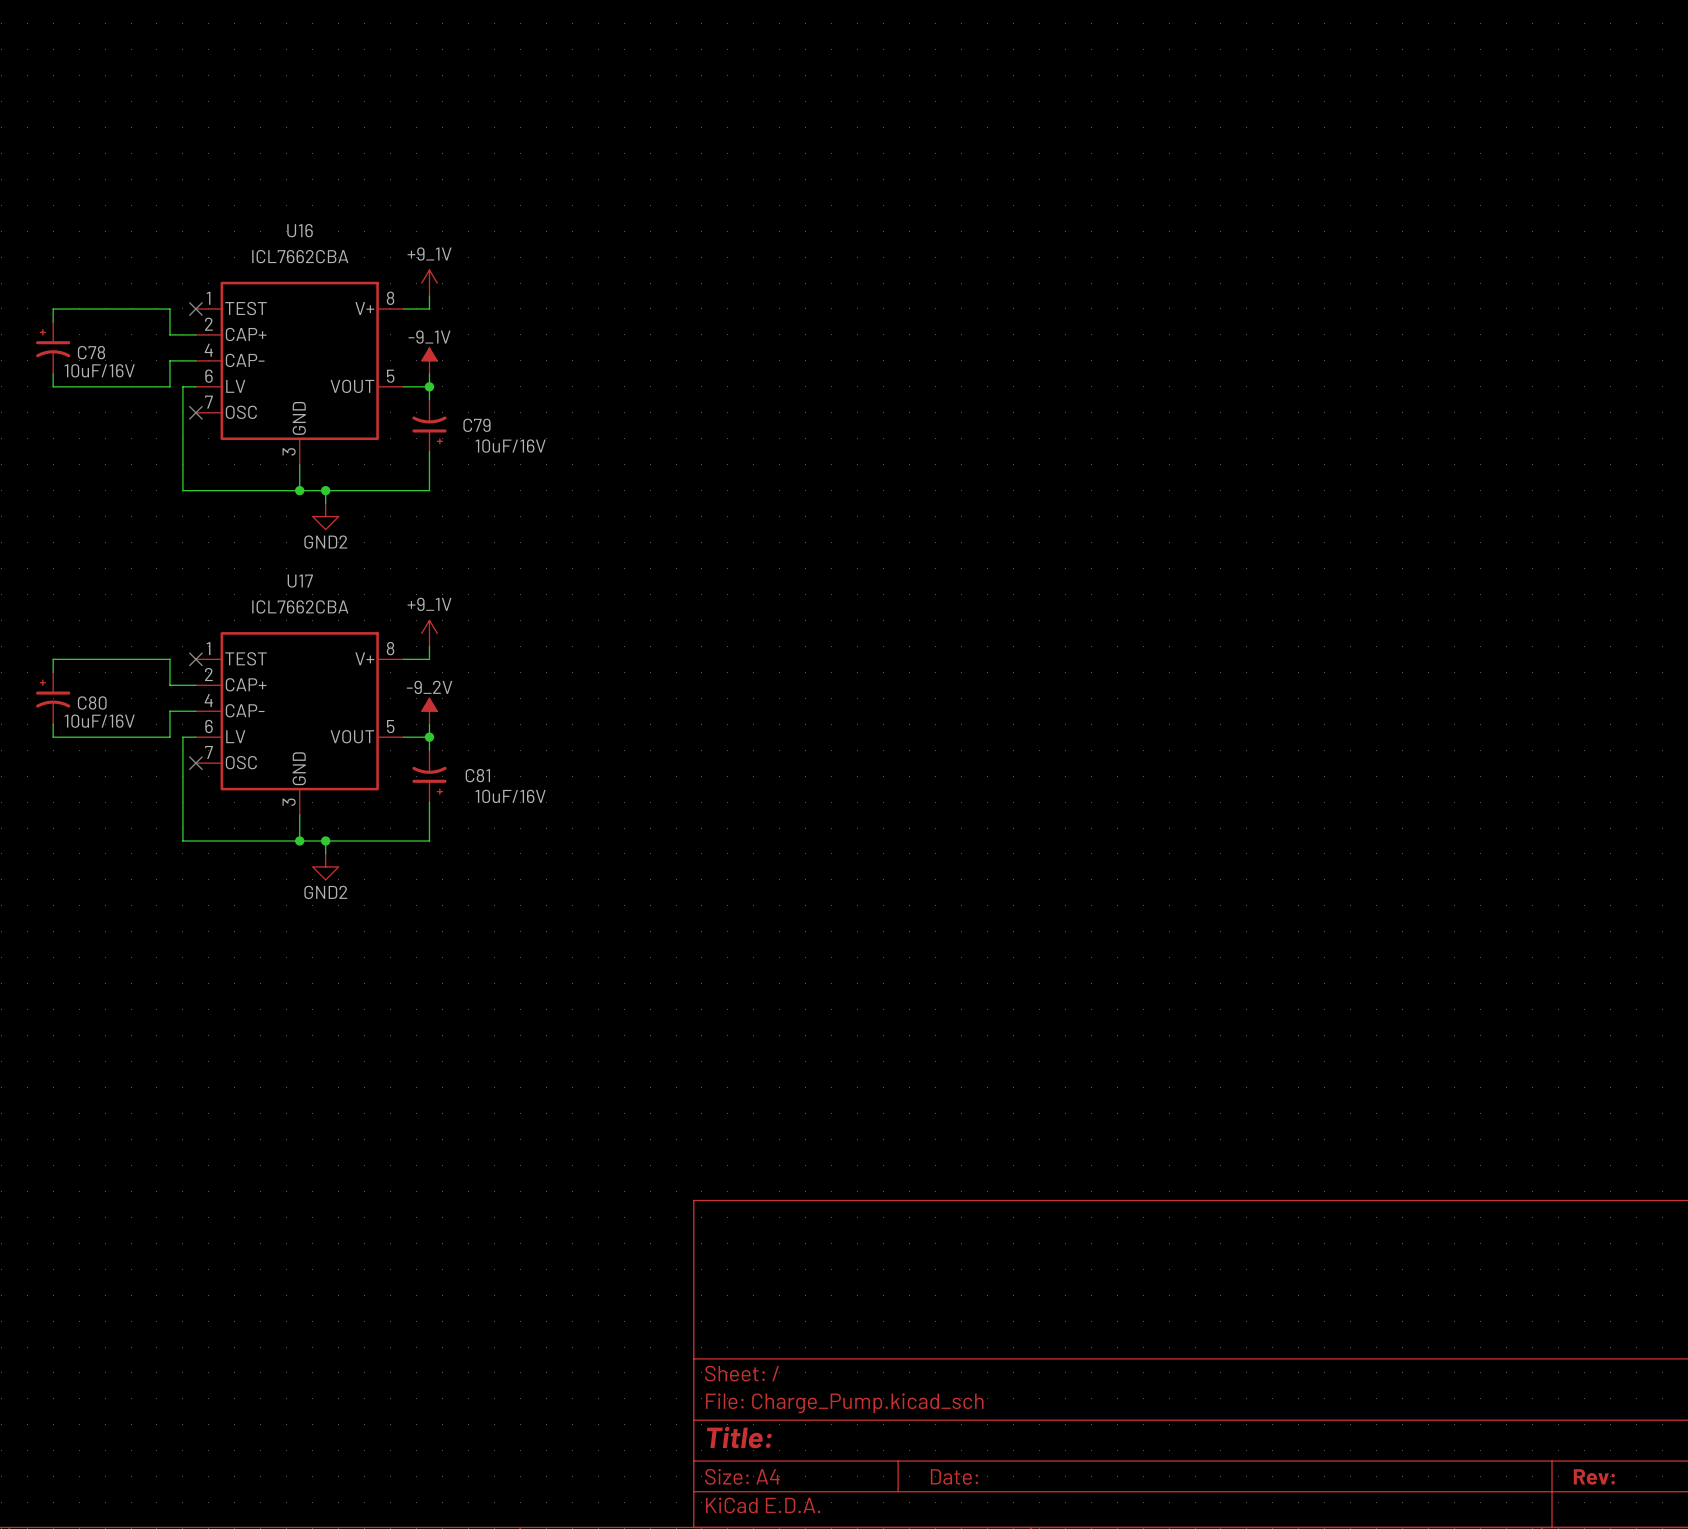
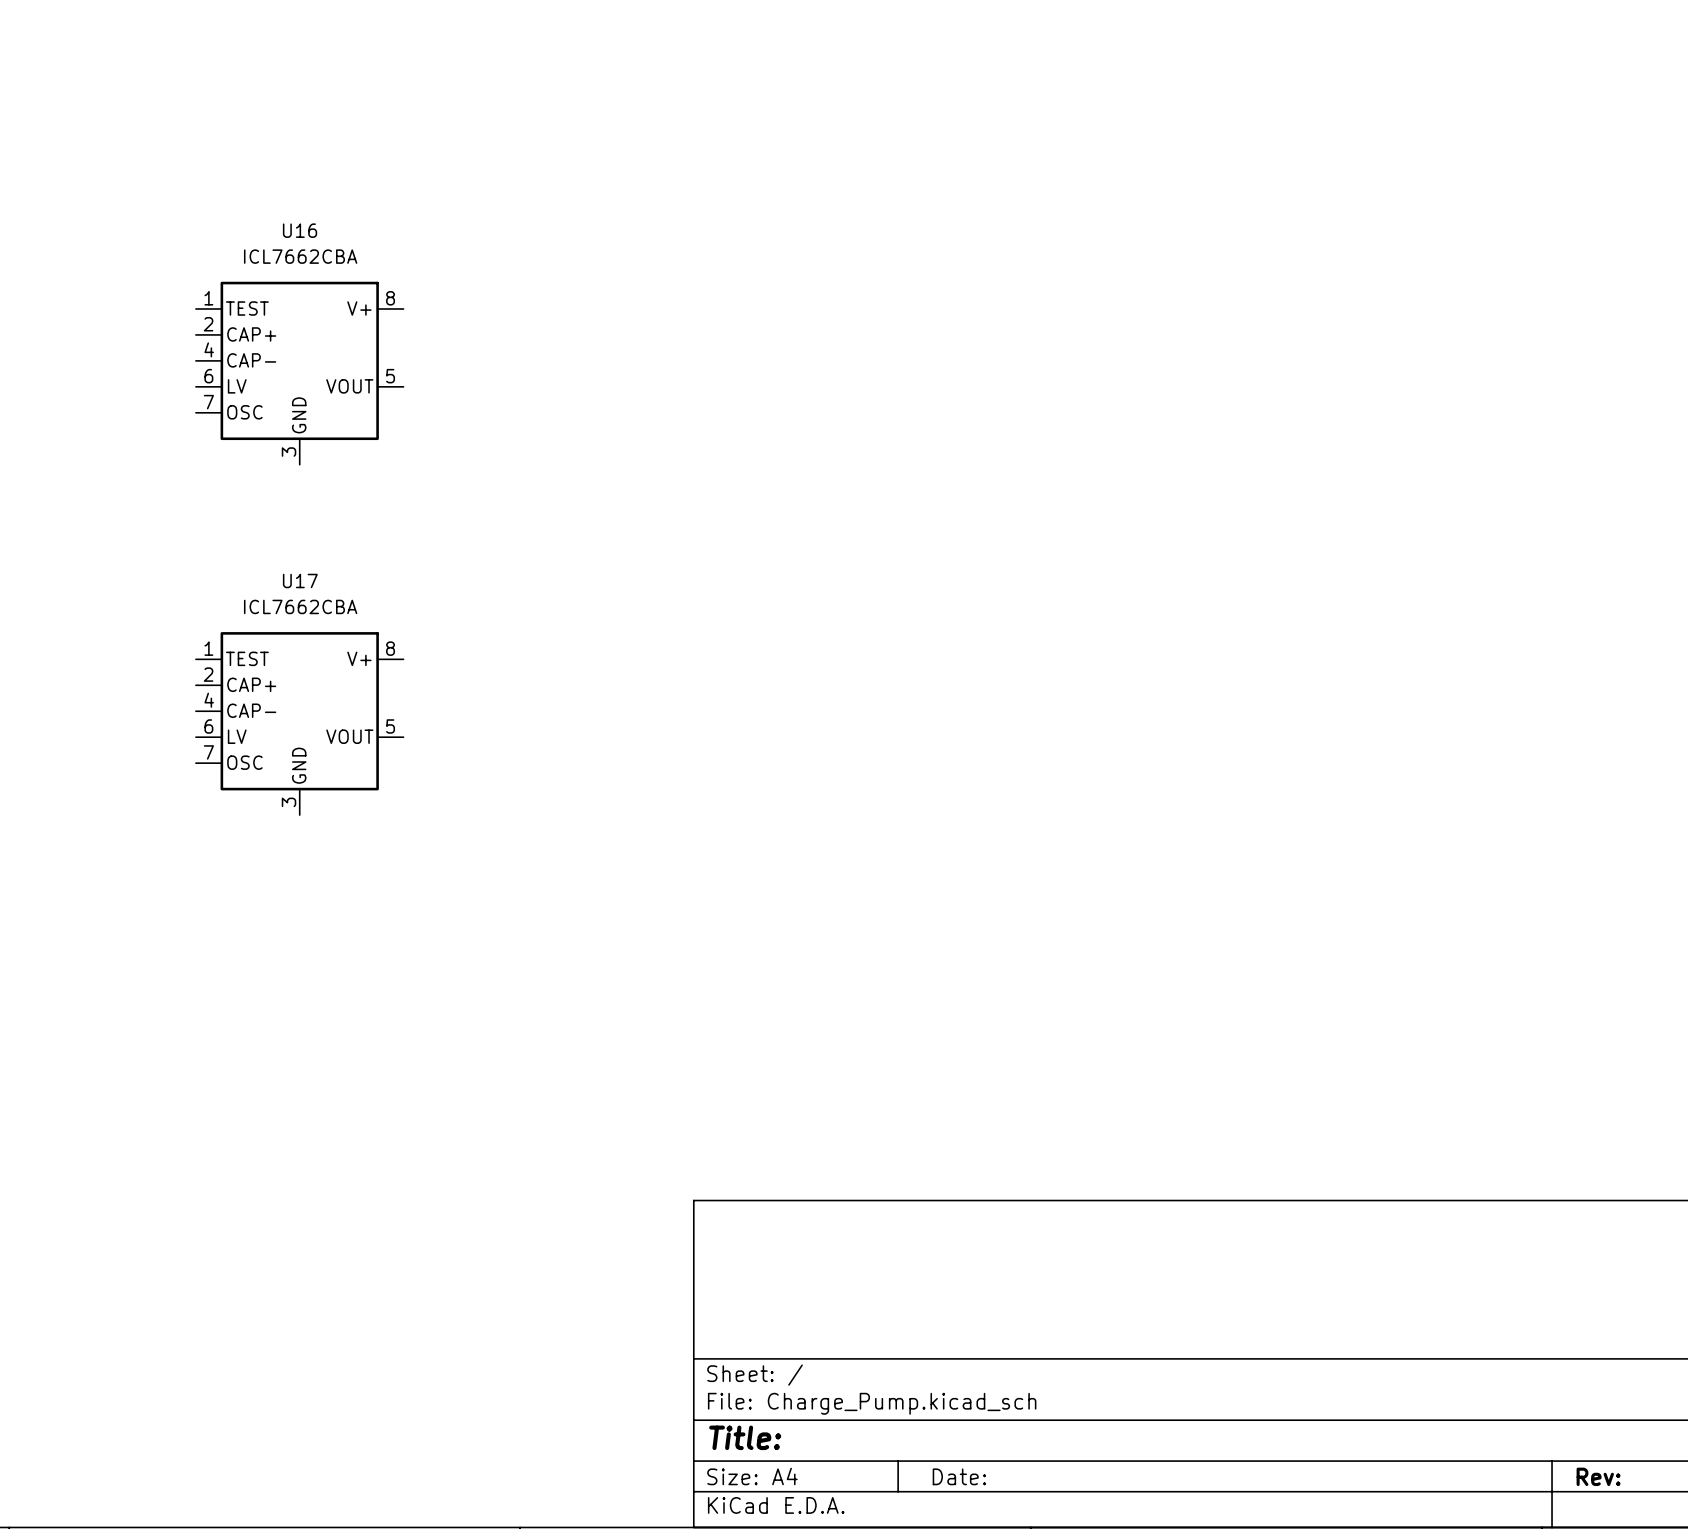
power symbol: +9_1V (429, 283) -> none
wire: (429, 296) (429, 308) (403, 308) -> none
no-connect mark: (195, 308) -> none
wire: (53, 321) (53, 308) (169, 308) (169, 334) (195, 334) -> none
C78: 10uF/16V (53, 347) -> none
wire: (195, 360) (169, 360) (169, 386) (53, 386) (53, 373) -> none
power symbol: -9_1V (429, 360) -> none
wire: (429, 373) (429, 399) -> none
wire: (195, 386) (182, 386) (182, 490) (429, 490) (429, 451) -> none
wire: (403, 386) (429, 386) -> none
junction: (429, 386) -> none
no-connect mark: (195, 412) -> none
C79: 10uF/16V (429, 425) -> none
wire: (299, 464) (299, 490) -> none
junction: (299, 490) -> none
wire: (325, 490) (325, 503) -> none
junction: (325, 490) -> none
power symbol: GND2 (325, 516) -> none
power symbol: +9_1V (429, 633) -> none
wire: (429, 646) (429, 659) (403, 659) -> none
no-connect mark: (195, 659) -> none
wire: (53, 672) (53, 659) (169, 659) (169, 685) (195, 685) -> none
C80: 10uF/16V (53, 698) -> none
wire: (195, 711) (169, 711) (169, 737) (53, 737) (53, 724) -> none
power symbol: -9_2V (429, 711) -> none
wire: (429, 724) (429, 750) -> none
wire: (195, 737) (182, 737) (182, 840) (429, 840) (429, 802) -> none
wire: (403, 737) (429, 737) -> none
junction: (429, 737) -> none
no-connect mark: (195, 763) -> none
C81: 10uF/16V (429, 776) -> none
wire: (299, 815) (299, 840) -> none
junction: (299, 840) -> none
wire: (325, 840) (325, 853) -> none
junction: (325, 840) -> none
power symbol: GND2 (325, 866) -> none

